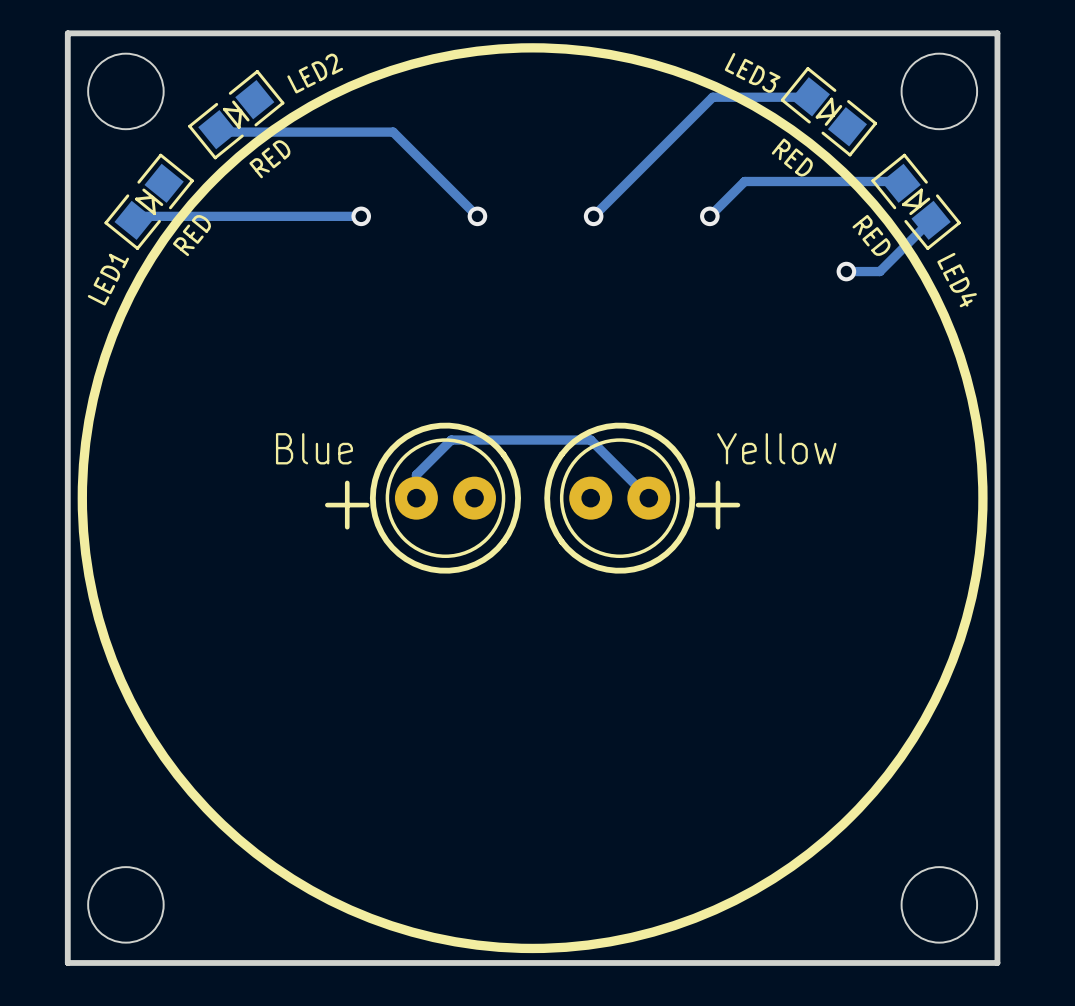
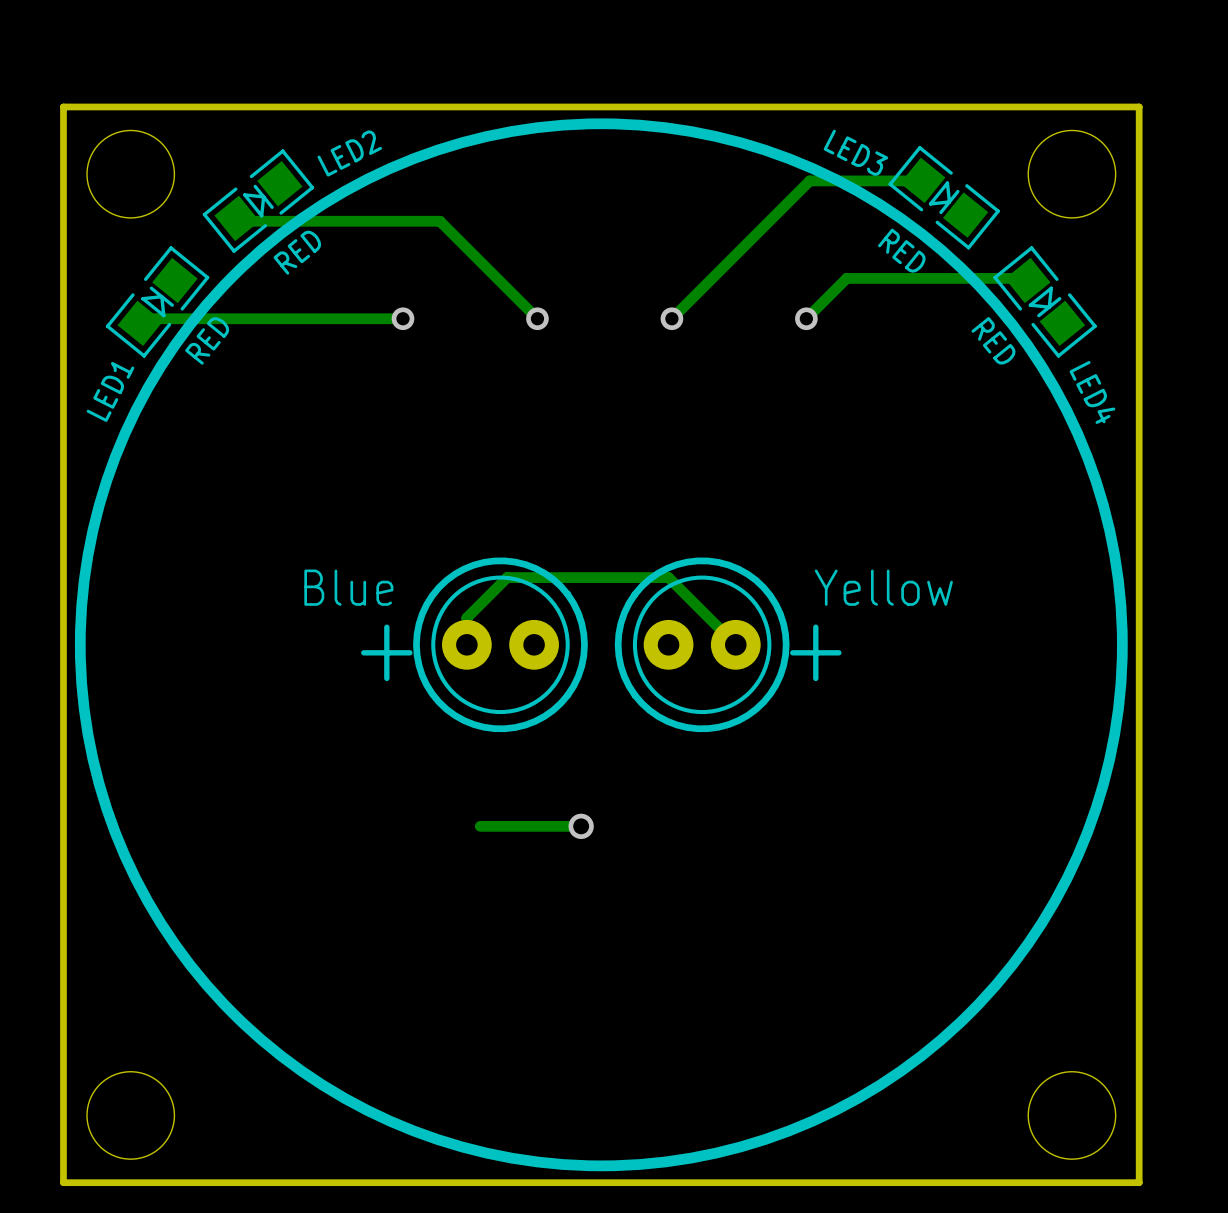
track: (931, 220) (879, 271) (846, 271) -> none
via: (846, 271) -> none
track: none -> (581, 826) (480, 826)
via: none -> (581, 826)

